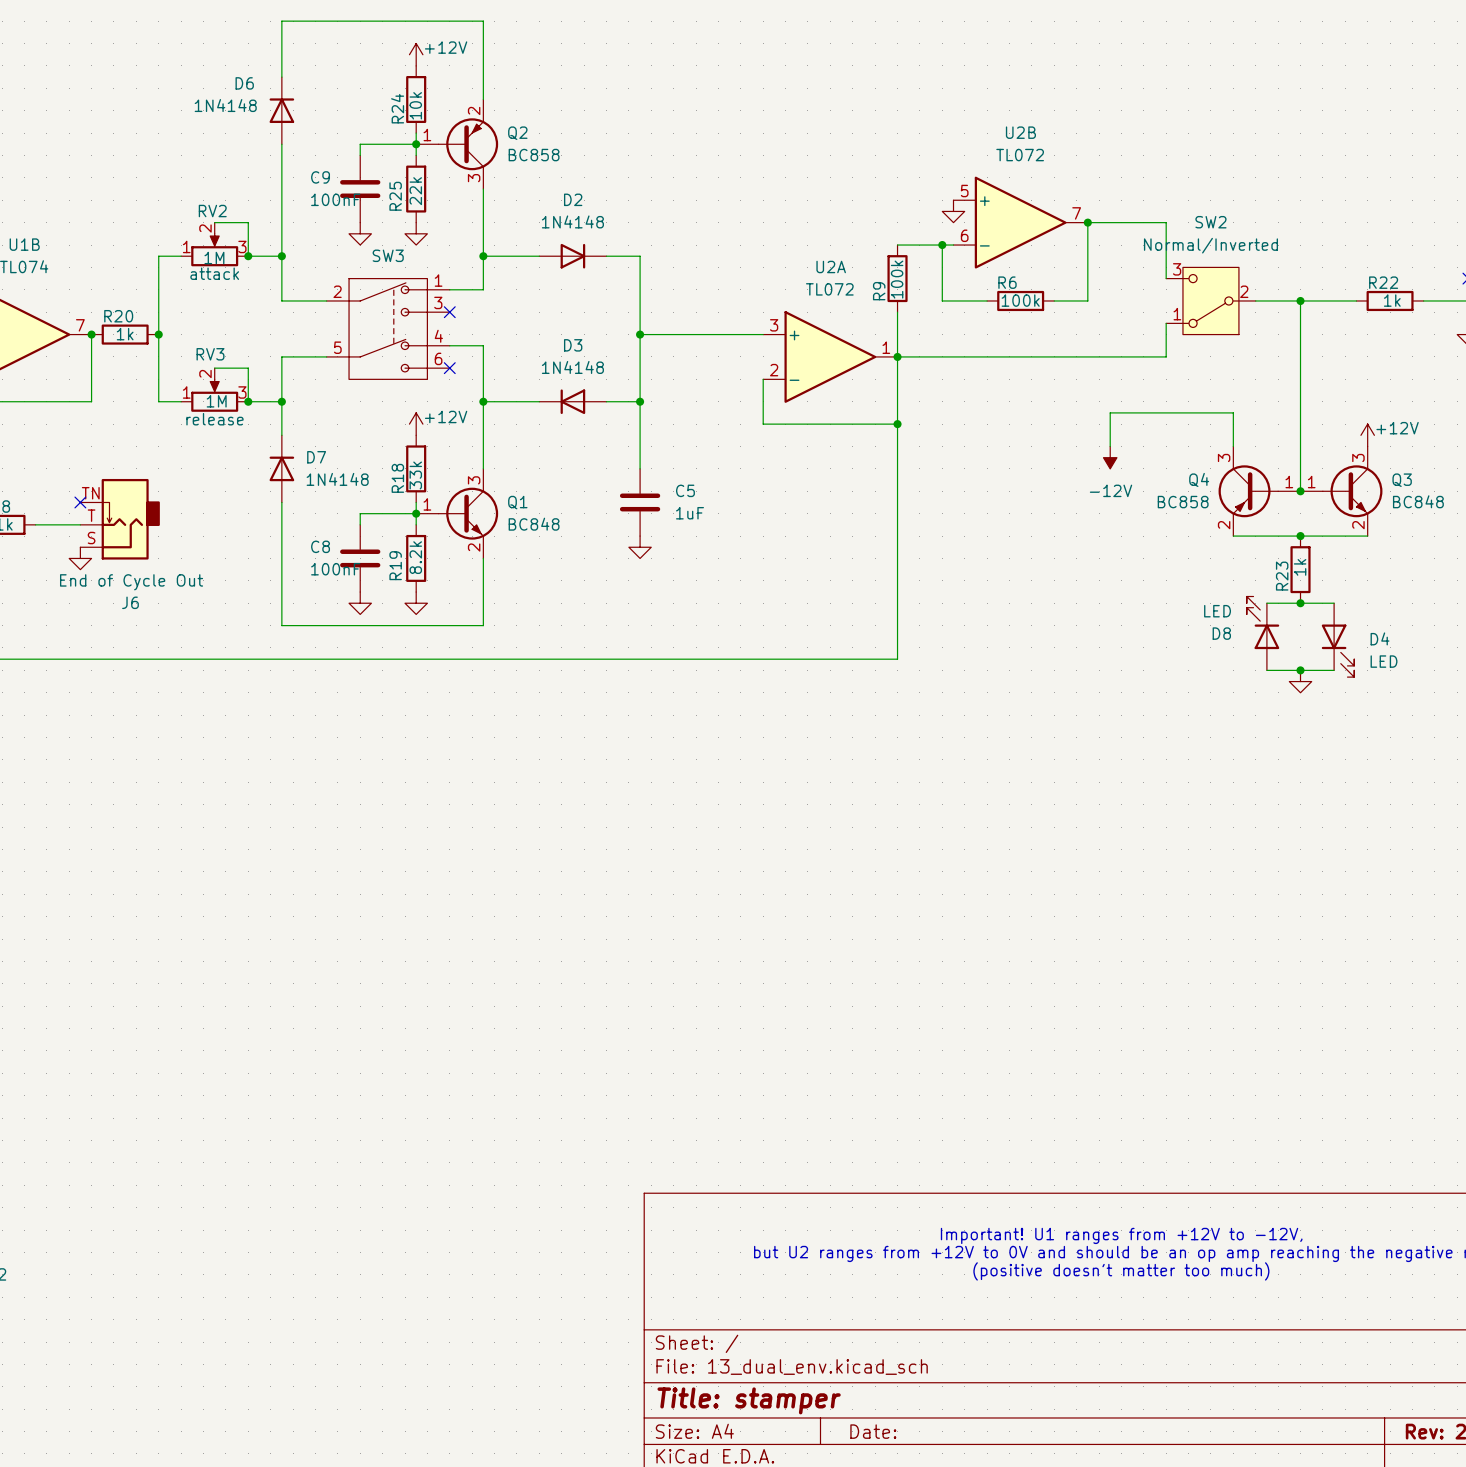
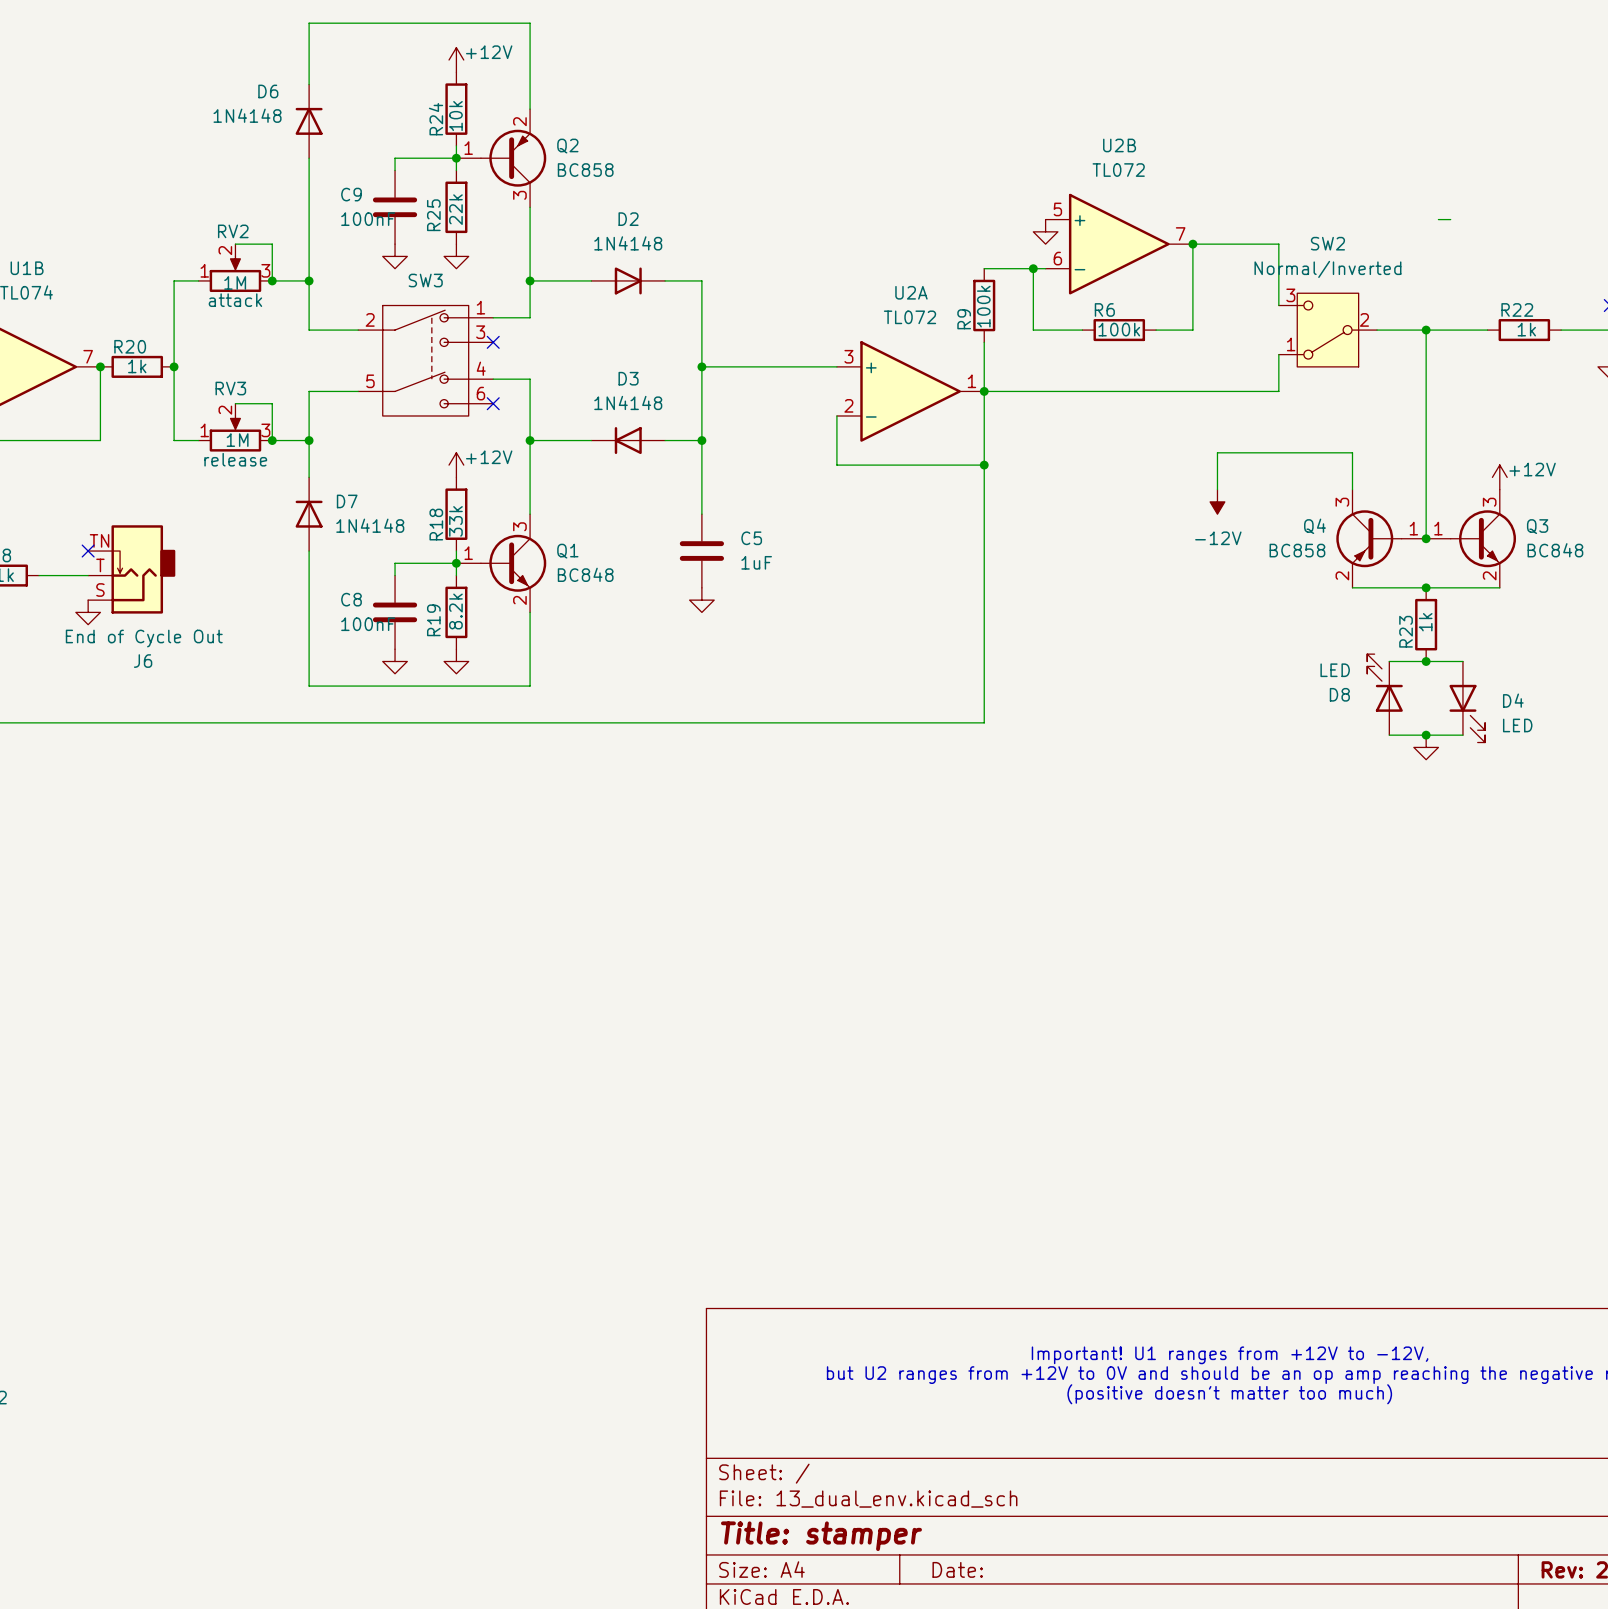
wire: none -> (1438, 219) (1450, 219)

